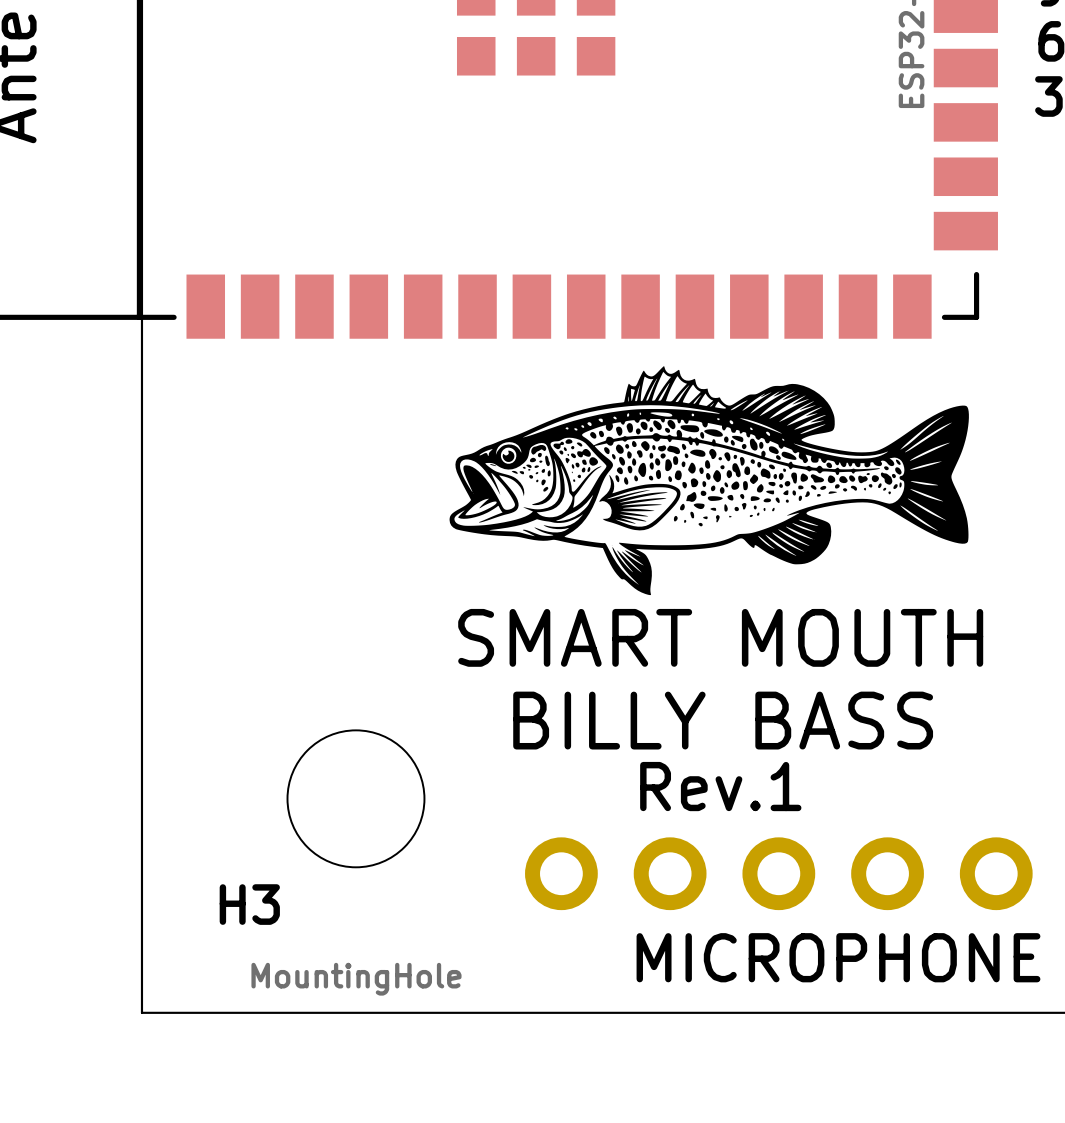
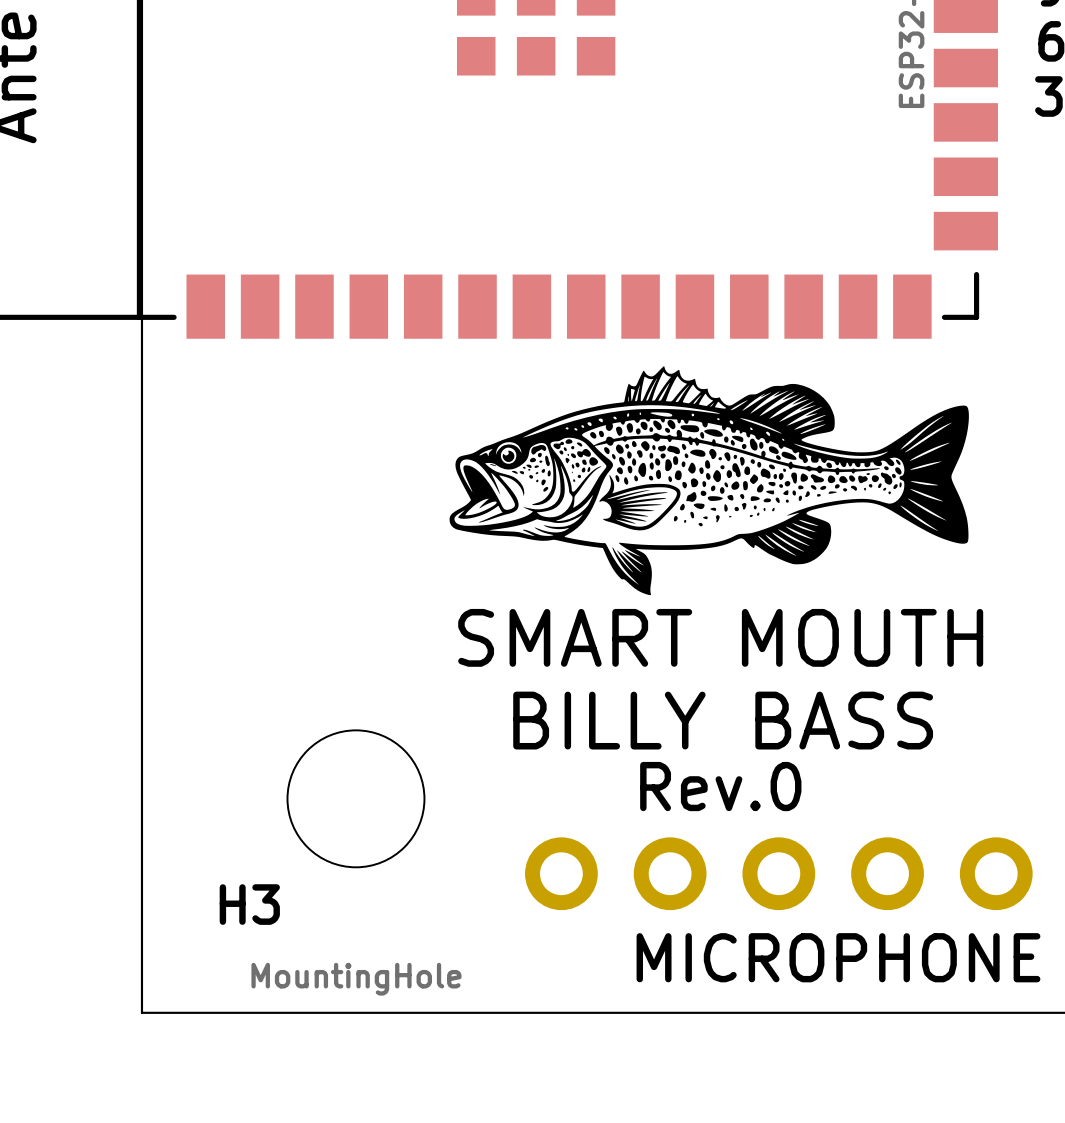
text: Rev.1 (720, 786) -> Rev.0 (720, 786)

